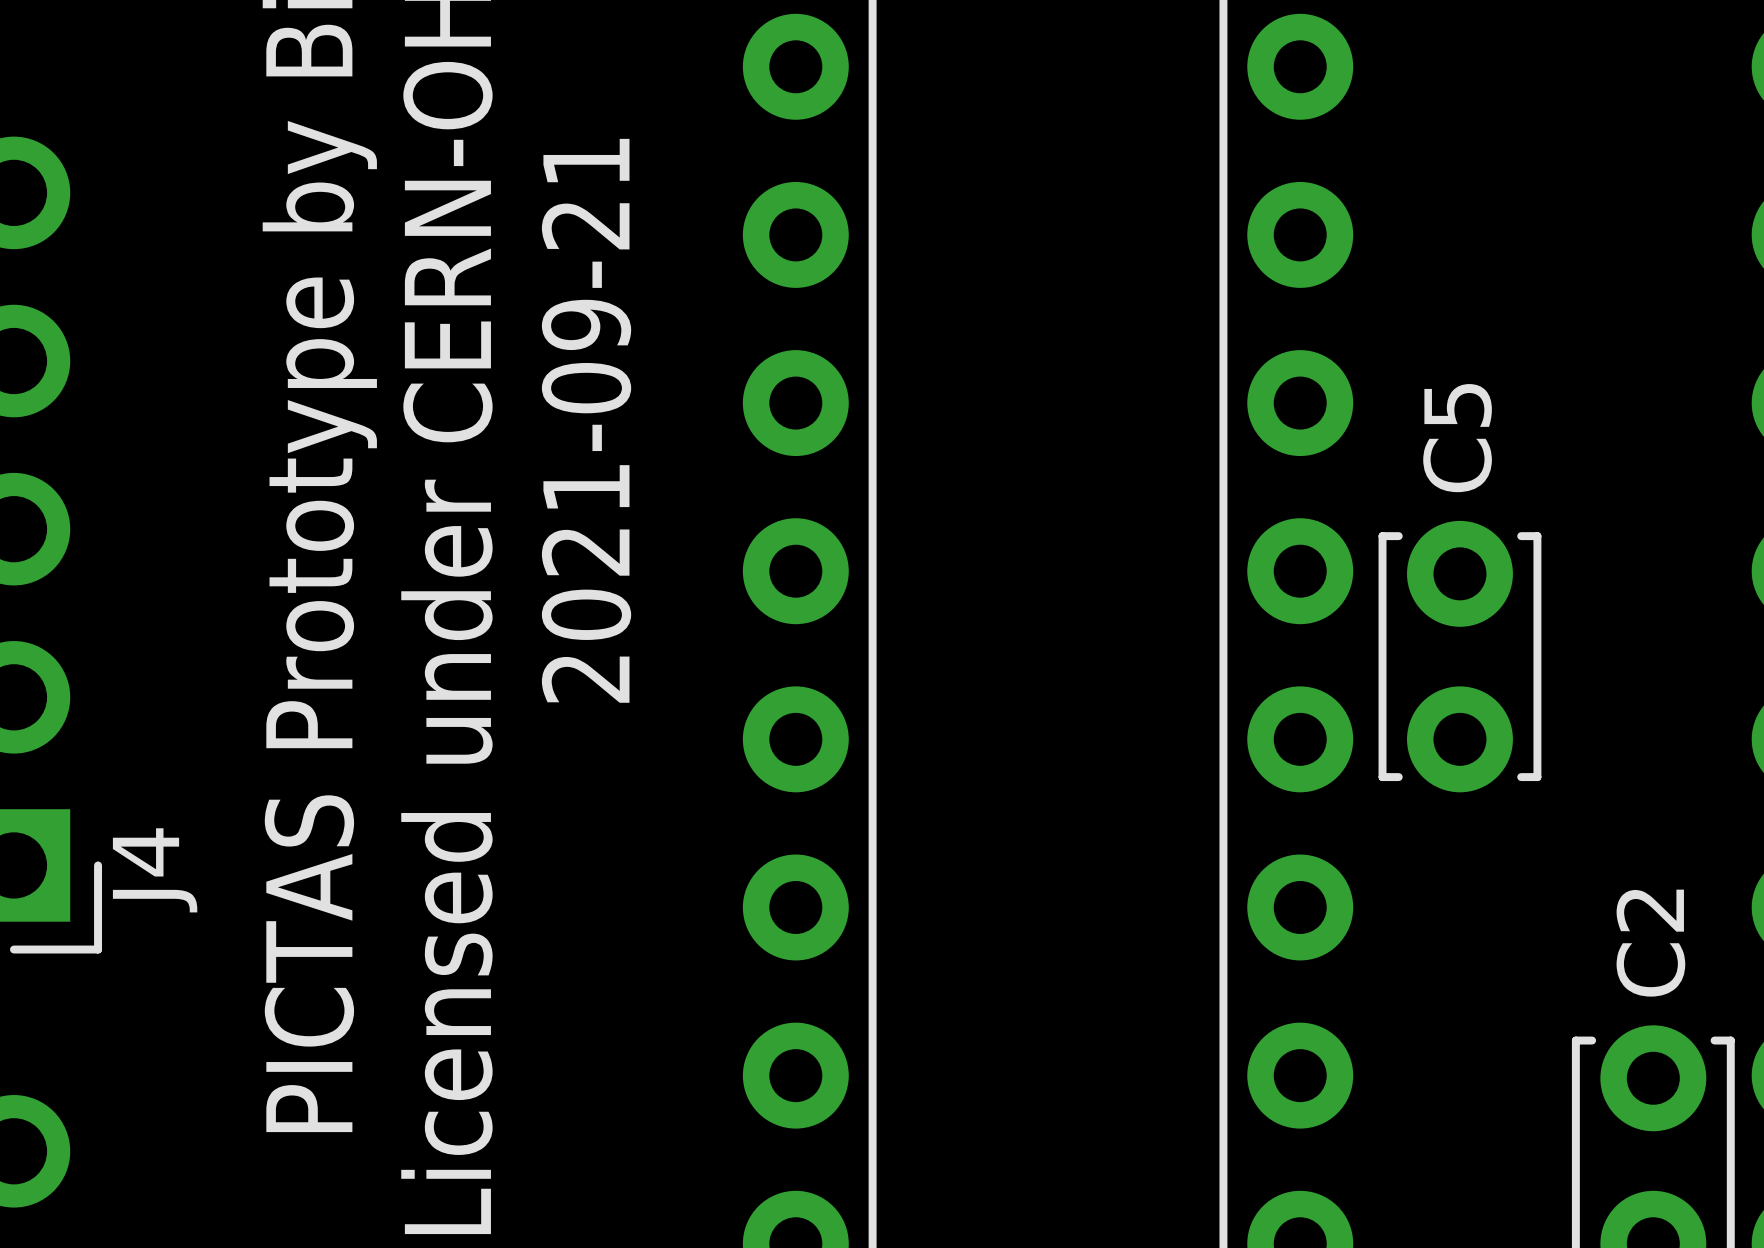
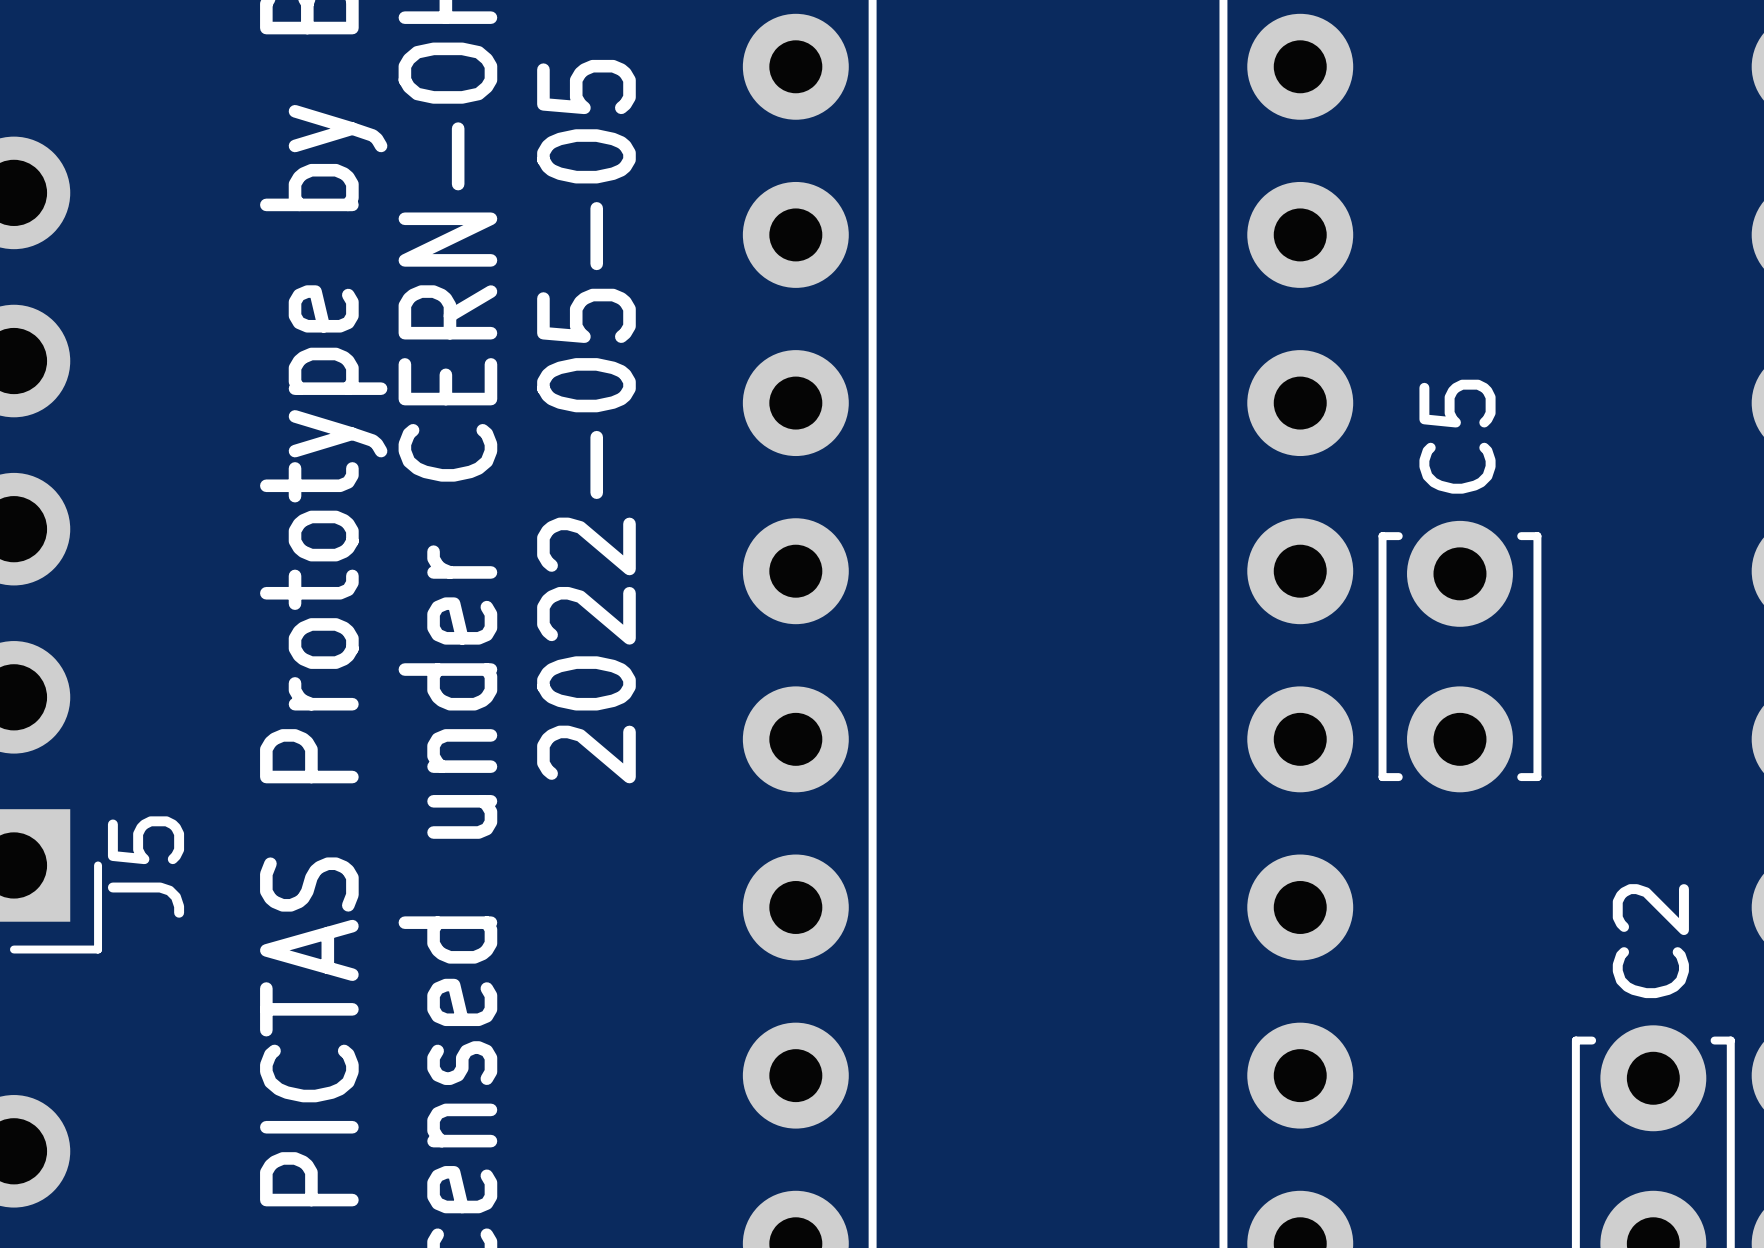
text: 2021-09-21 (586, 420) -> 2022-05-05 (586, 421)
J4 name: J4 (155, 870) -> J5 (146, 867)

